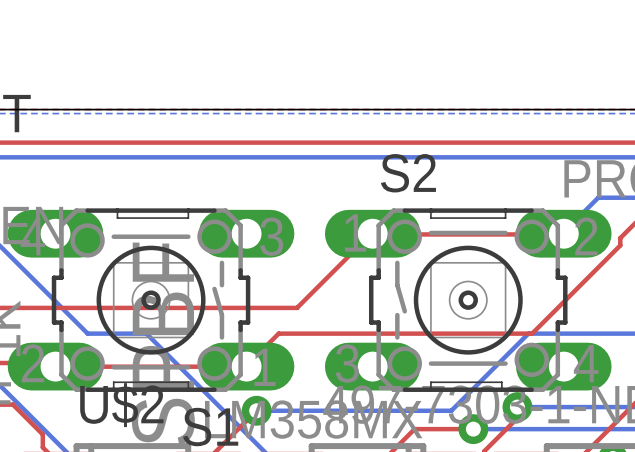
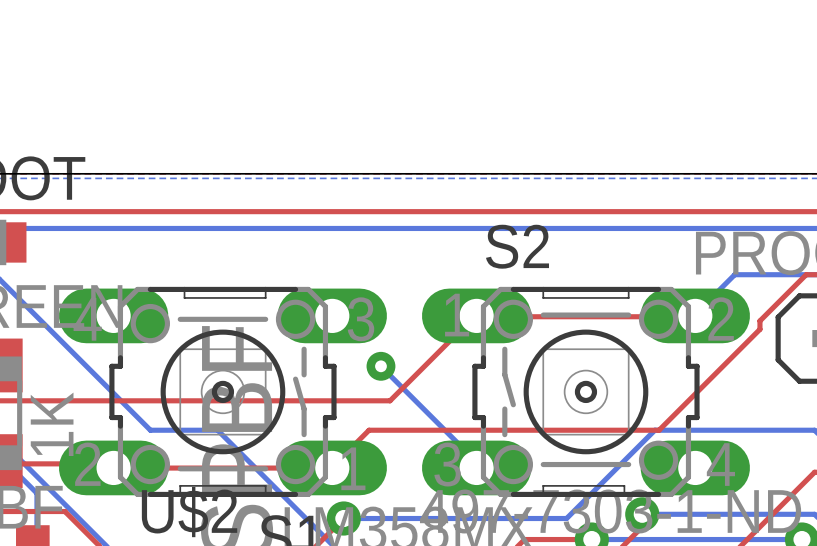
bottom track: none -> (380, 366) (476, 461) (476, 467)
via: none -> (380, 366)

